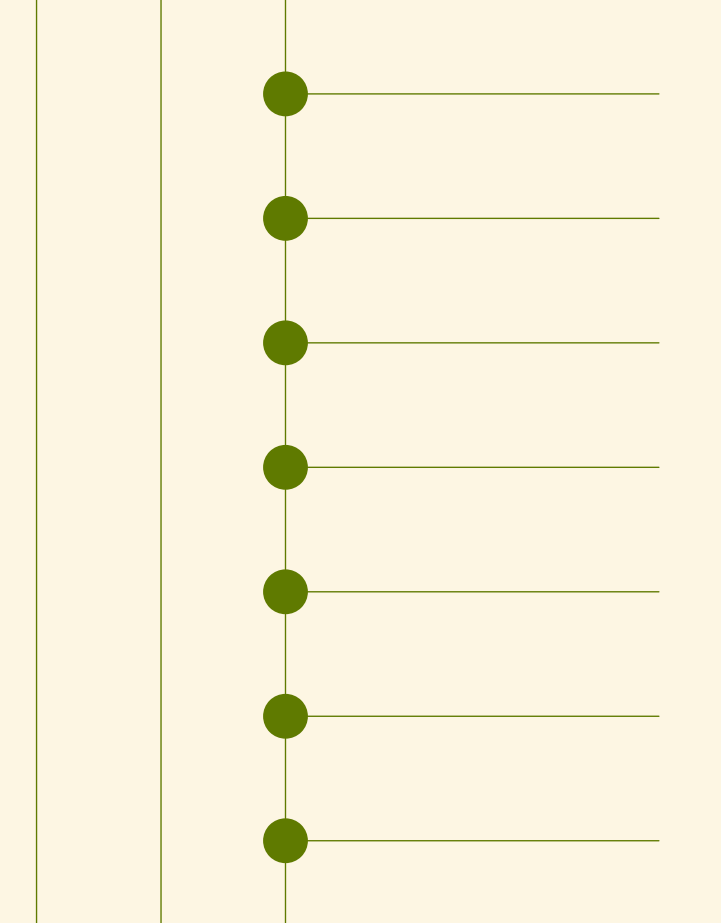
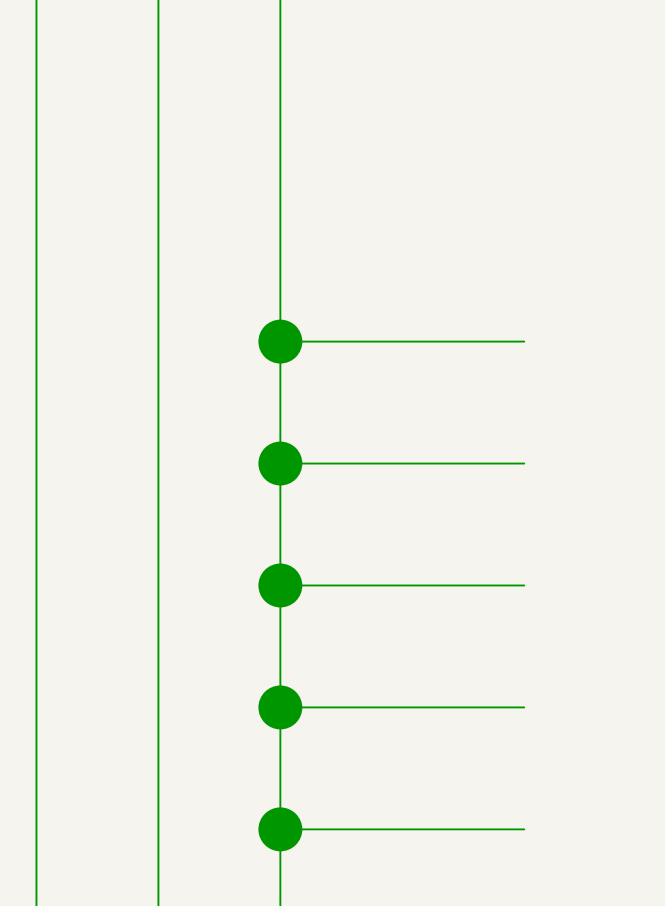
wire: (285, 93) (658, 93) -> none
junction: (285, 93) -> none
wire: (285, 218) (658, 218) -> none
junction: (285, 218) -> none
wire: (534, 342) (658, 342) -> none
wire: (534, 467) (658, 467) -> none
wire: (534, 591) (658, 591) -> none
wire: (534, 716) (658, 716) -> none
wire: (534, 840) (658, 840) -> none

